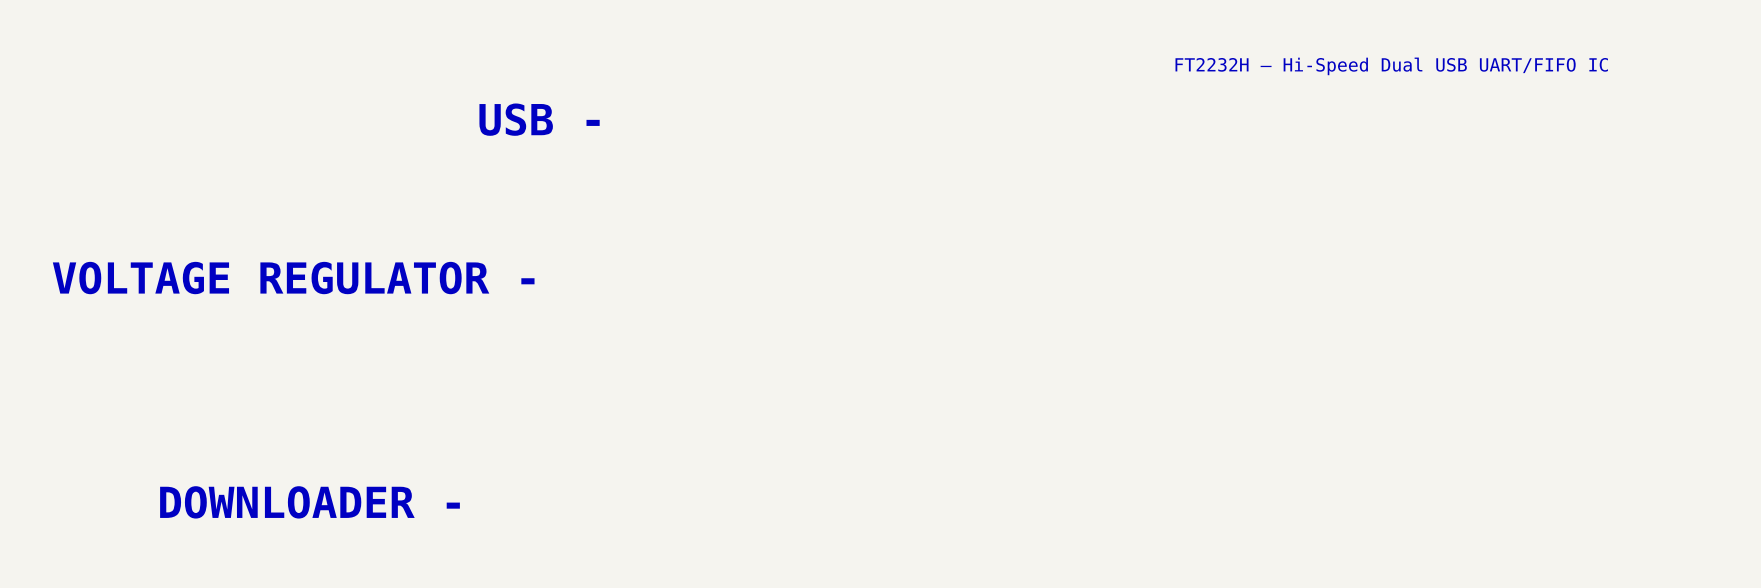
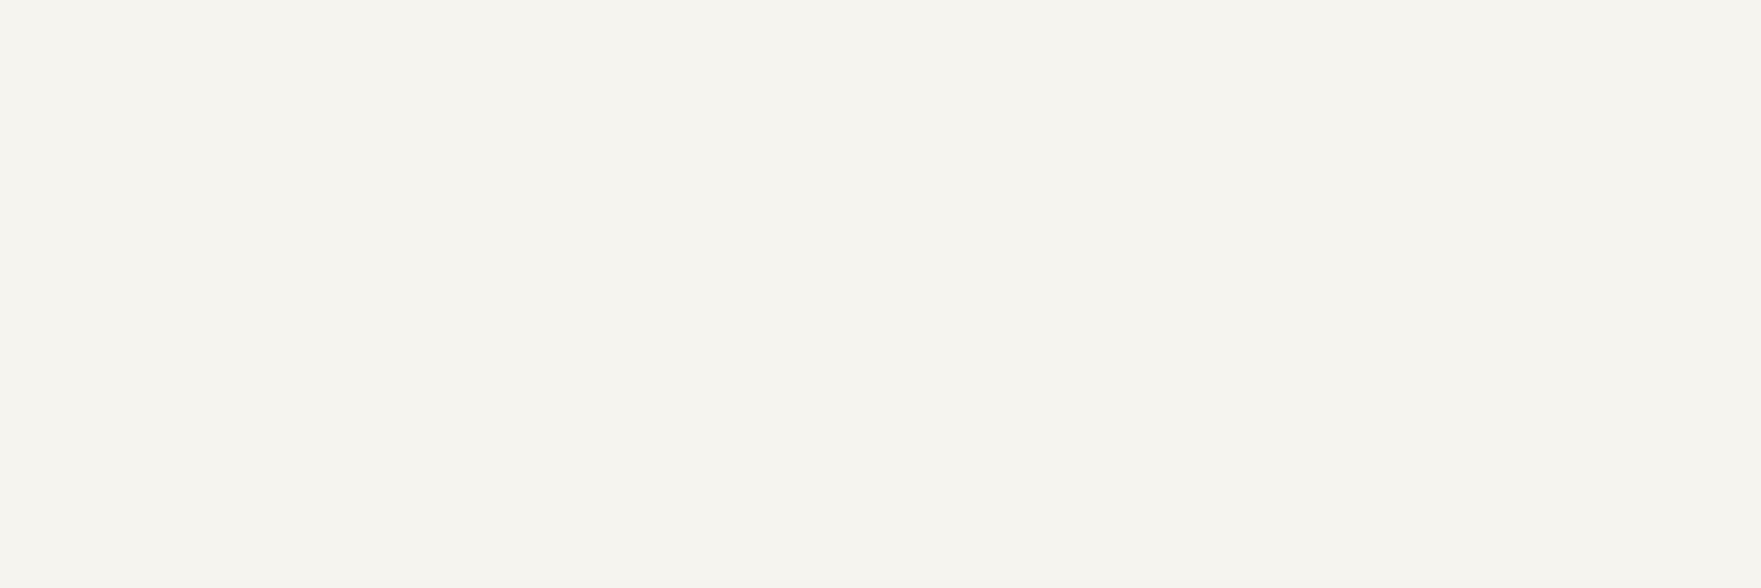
text: FT2232H – Hi-Speed Dual USB UART/FIFO IC (1391, 66) -> none
text: USB - (539, 119) -> none
text: VOLTAGE REGULATOR - (293, 278) -> none
text: DOWNLOADER - (310, 502) -> none

